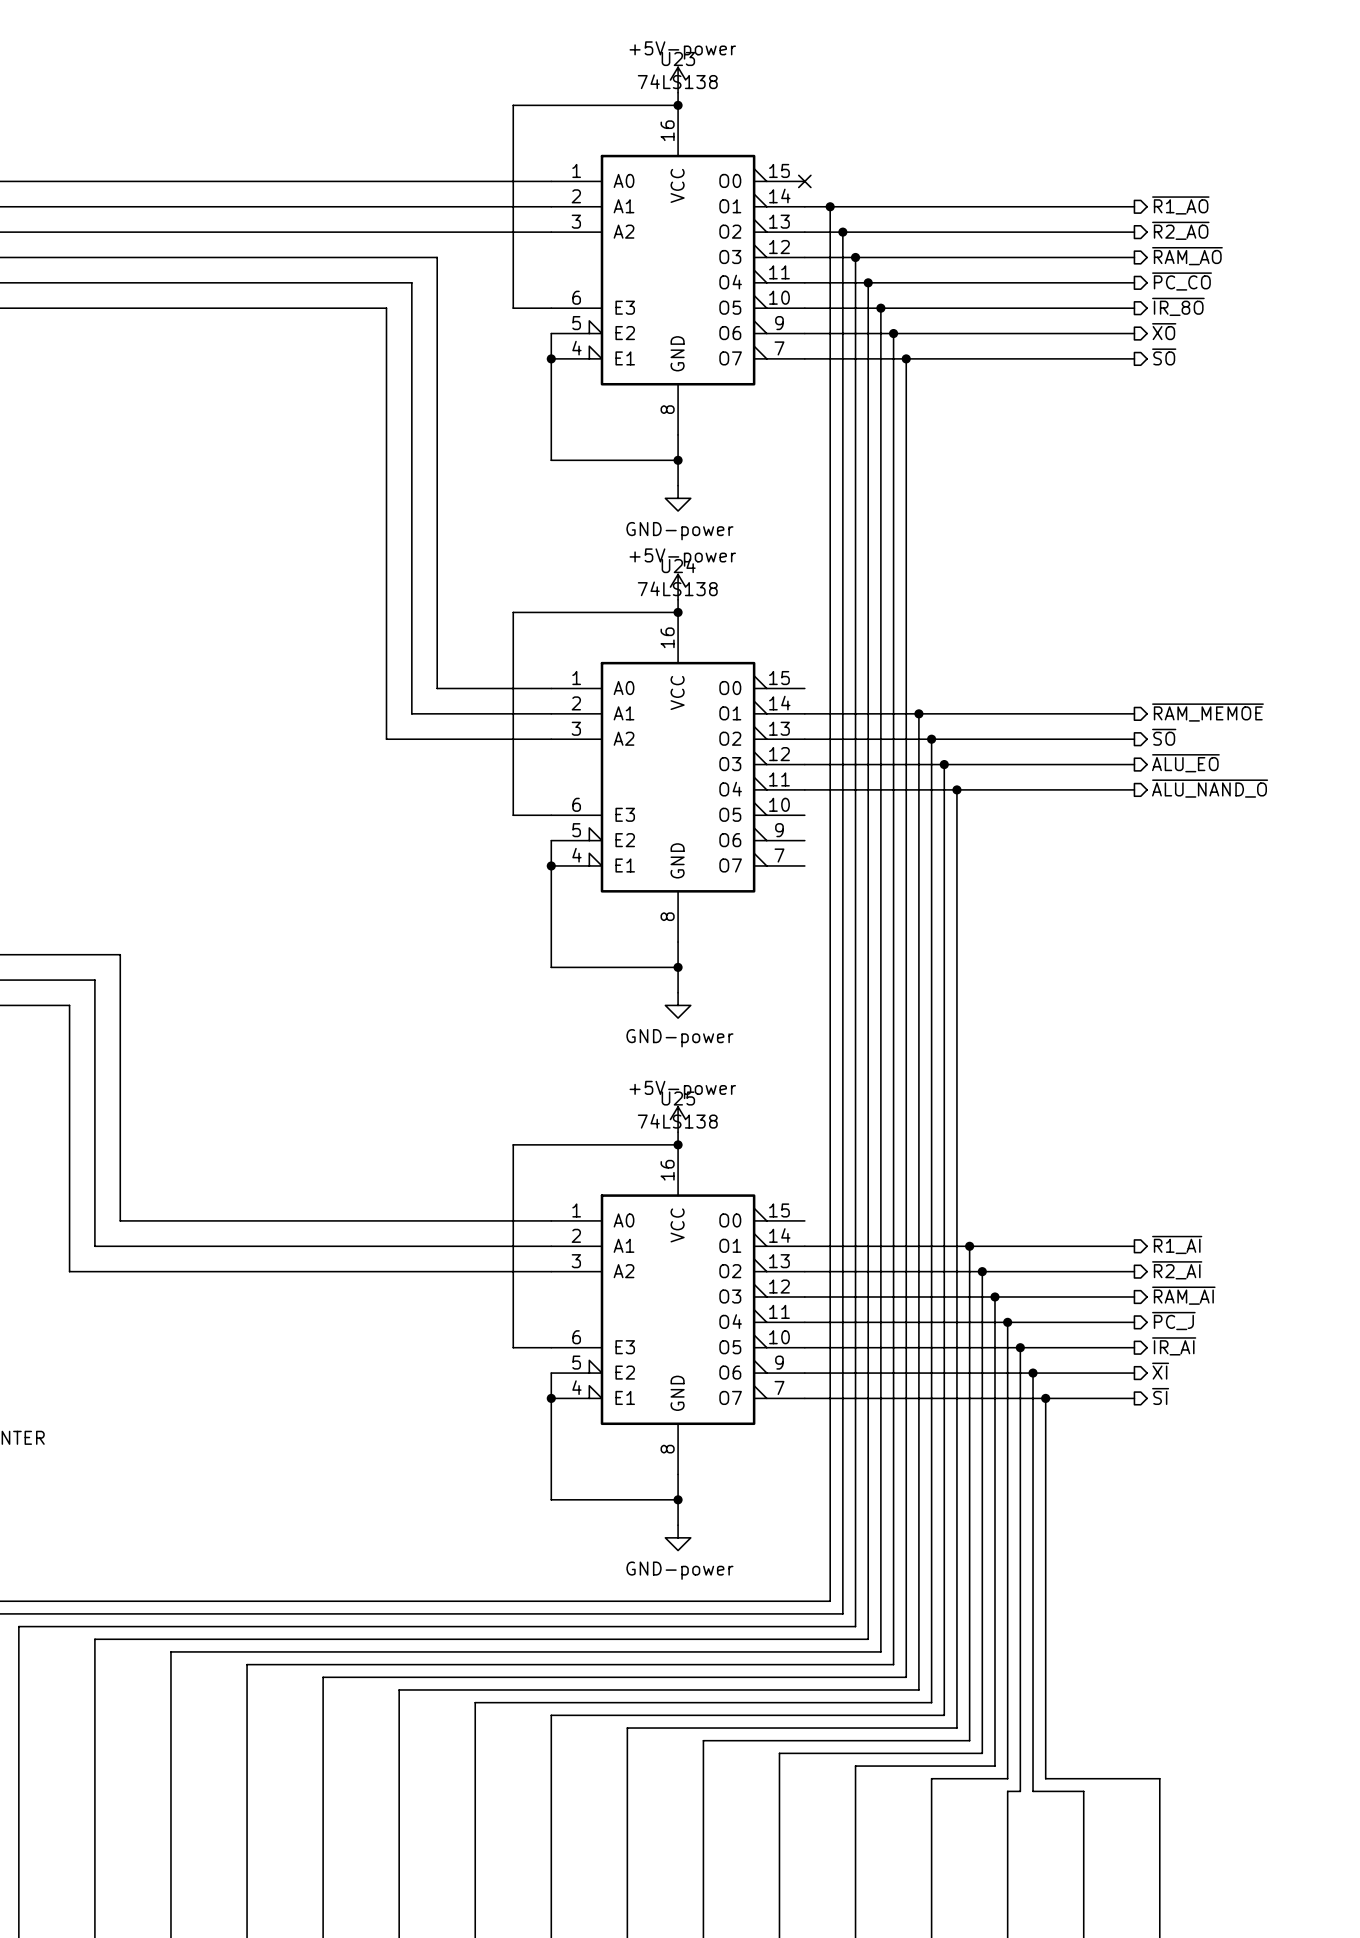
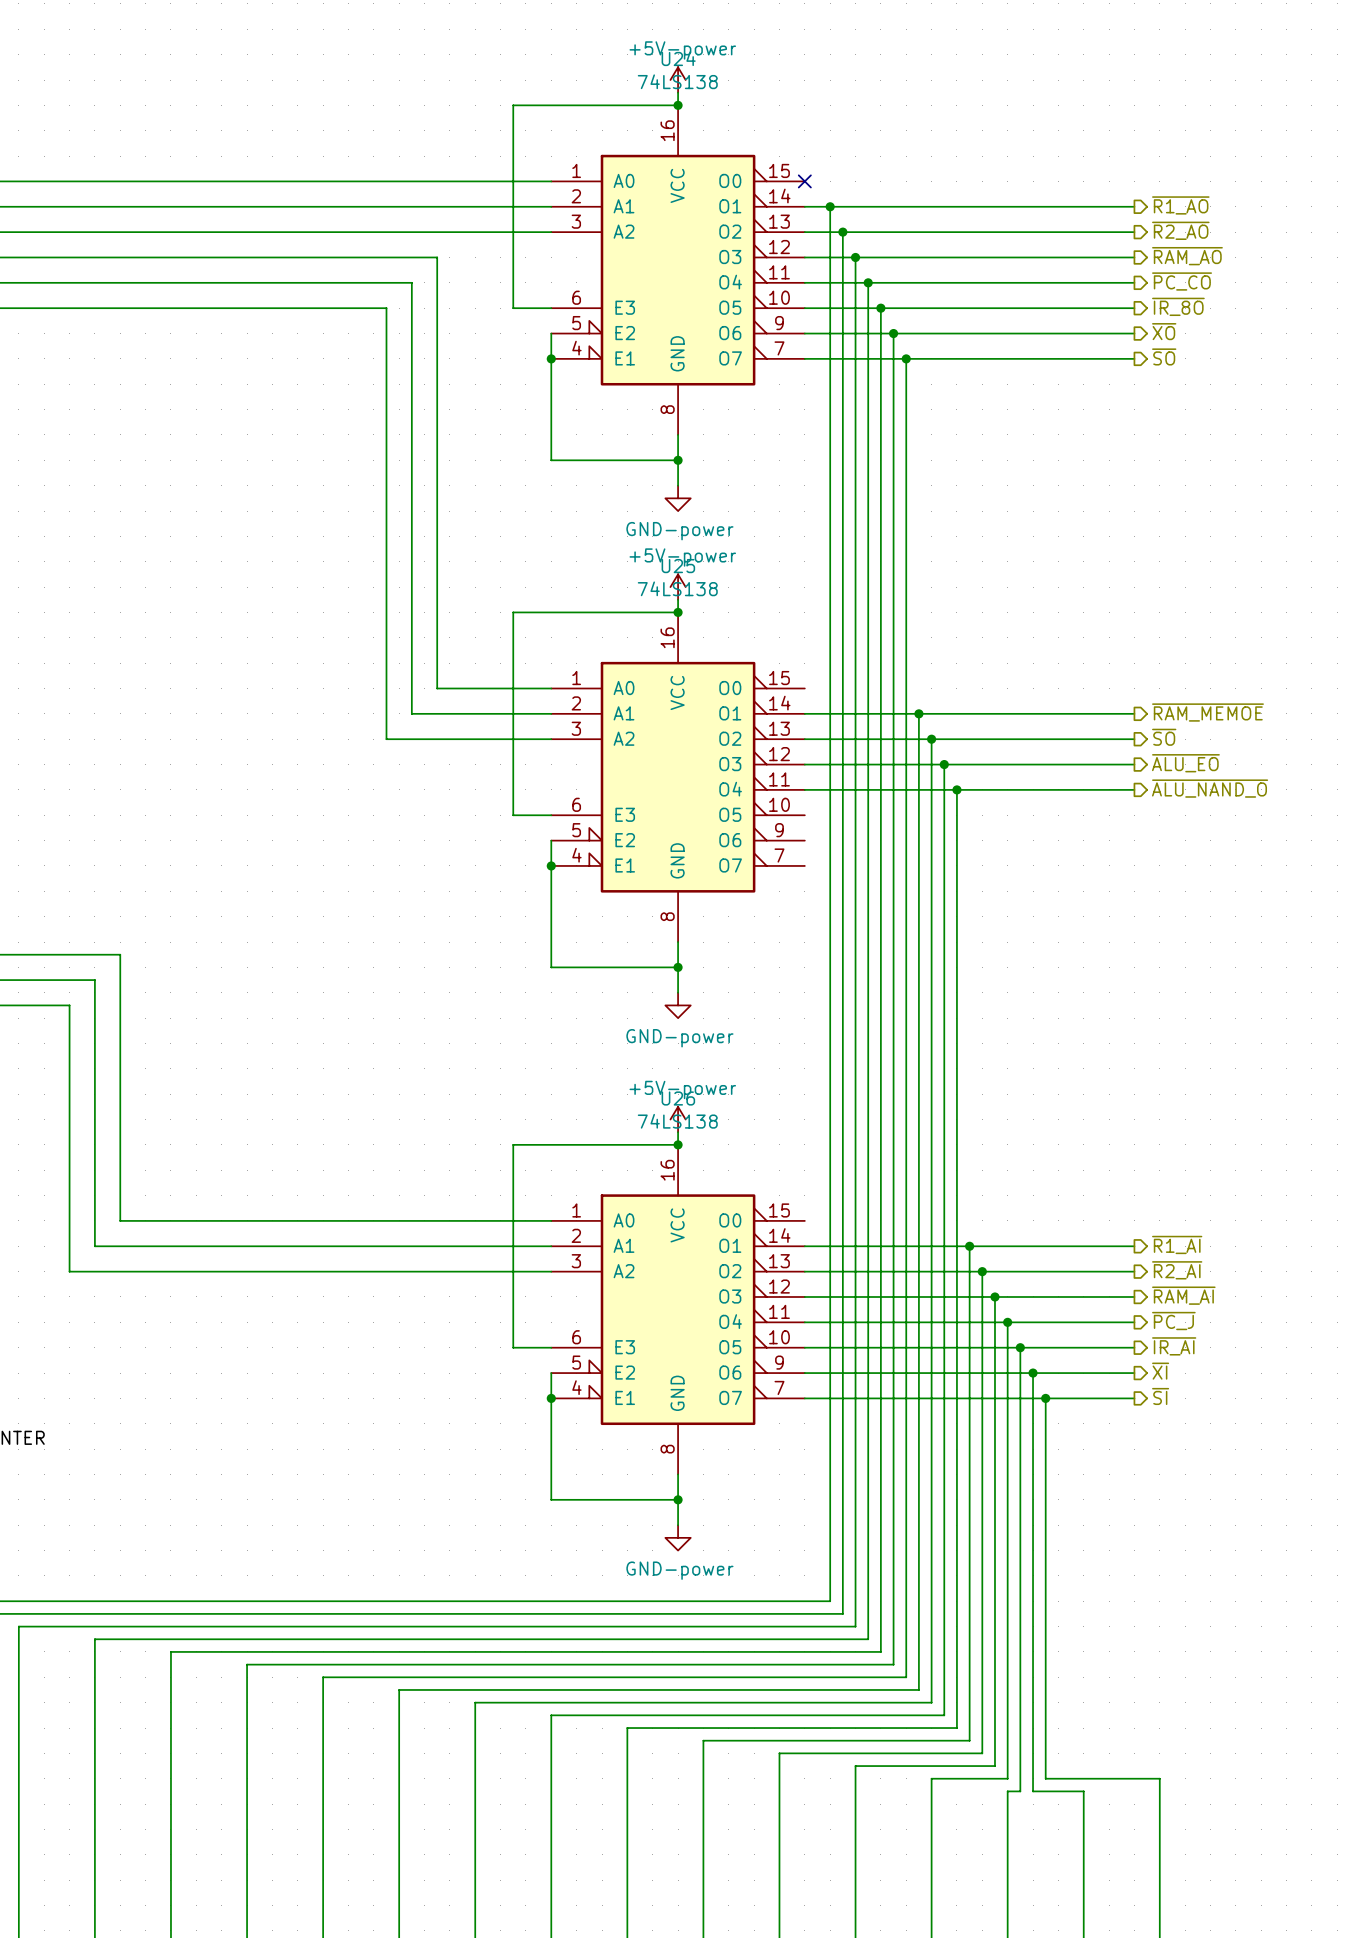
U23 name: U23 (678, 58) -> U24 (678, 58)
U24 name: U24 (678, 565) -> U25 (678, 566)
U25 name: U25 (678, 1098) -> U26 (678, 1098)

